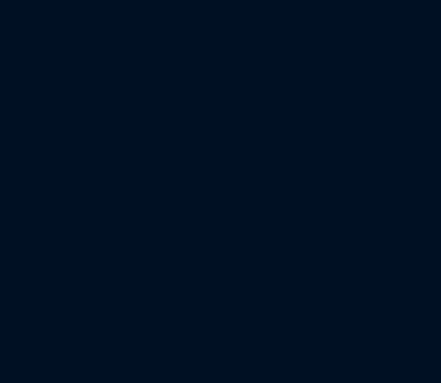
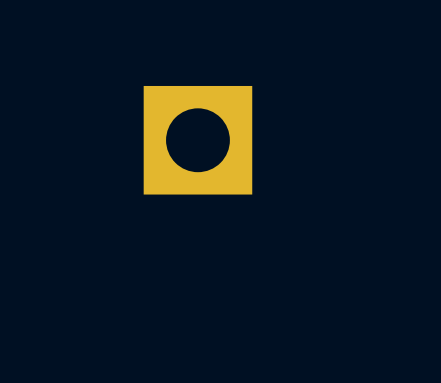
part: none -> (197, 140)

